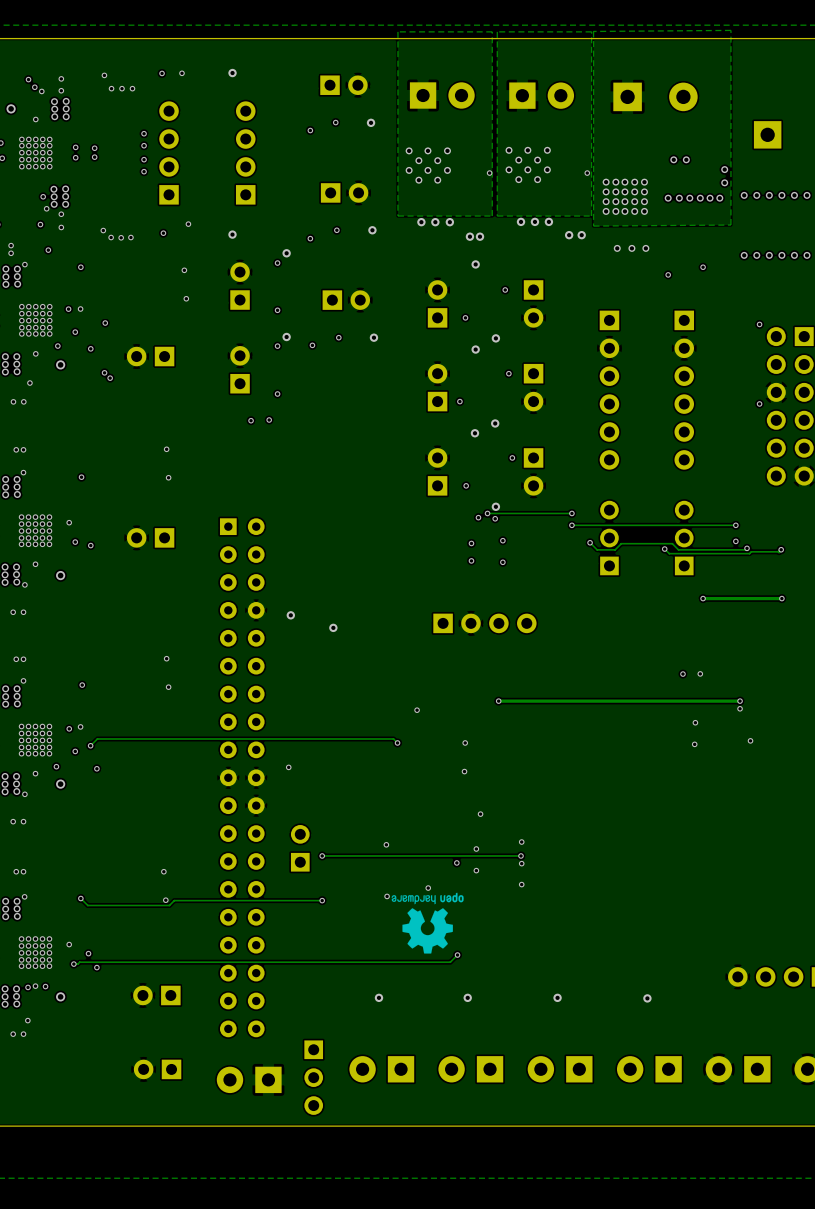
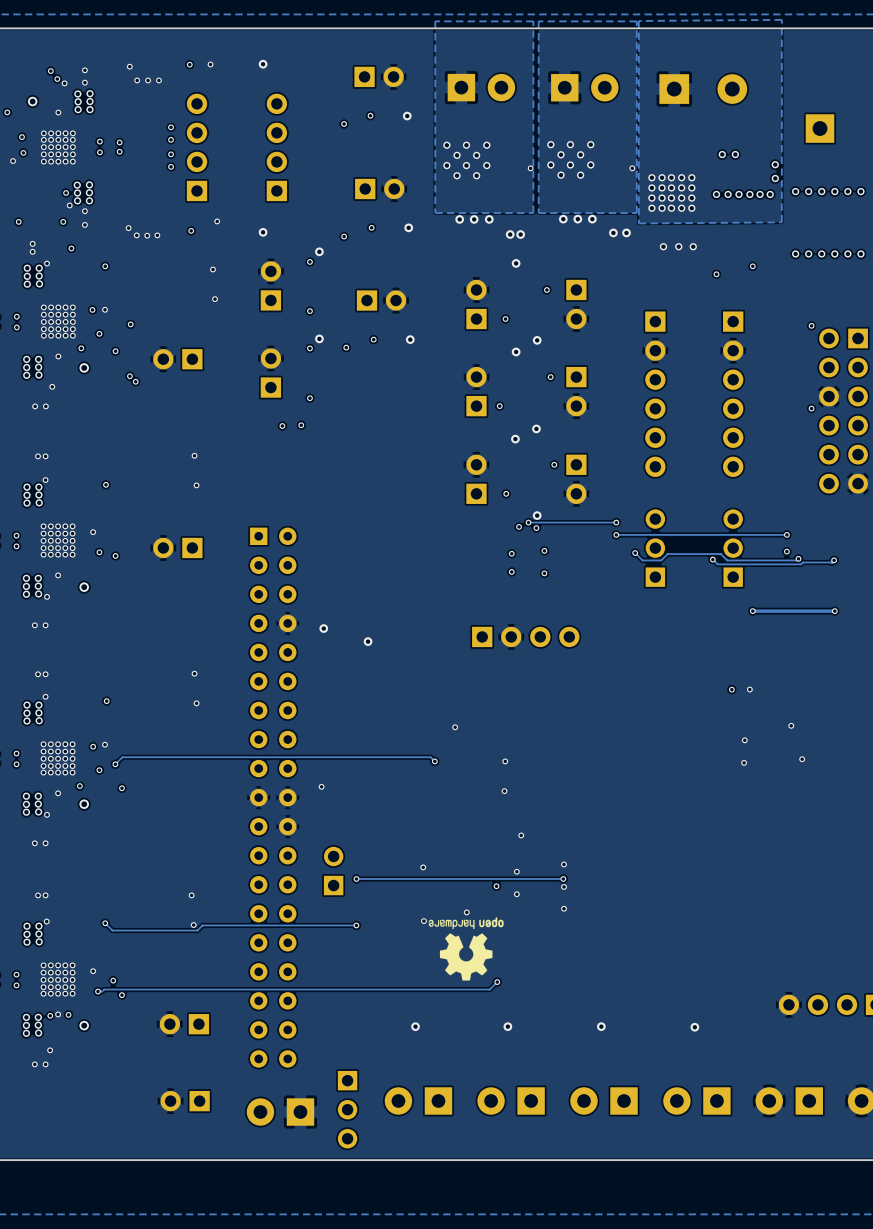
via: (498, 701) -> none
track: (740, 701) (498, 701) -> none
via: (740, 701) -> none

